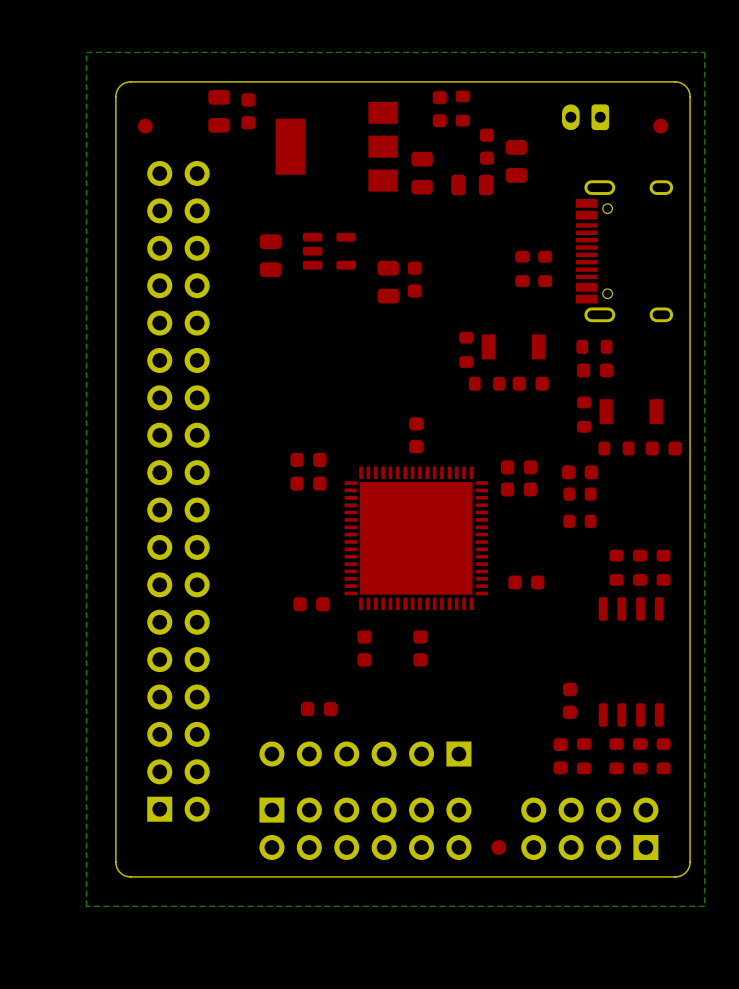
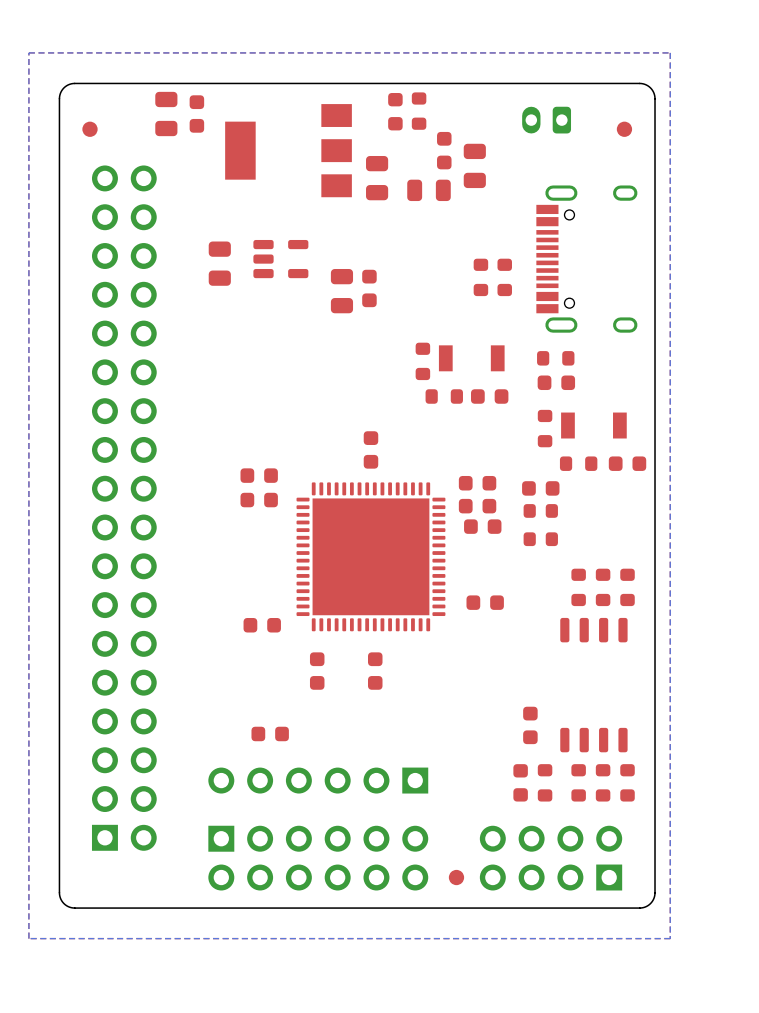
part: none -> (482, 526)

